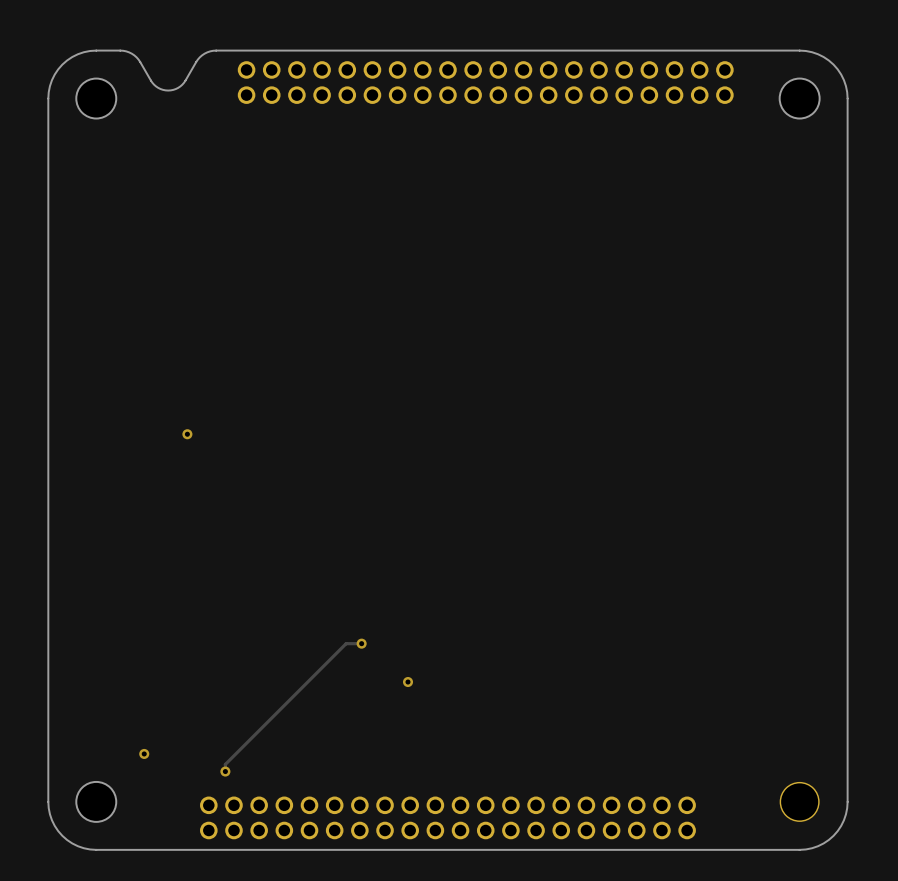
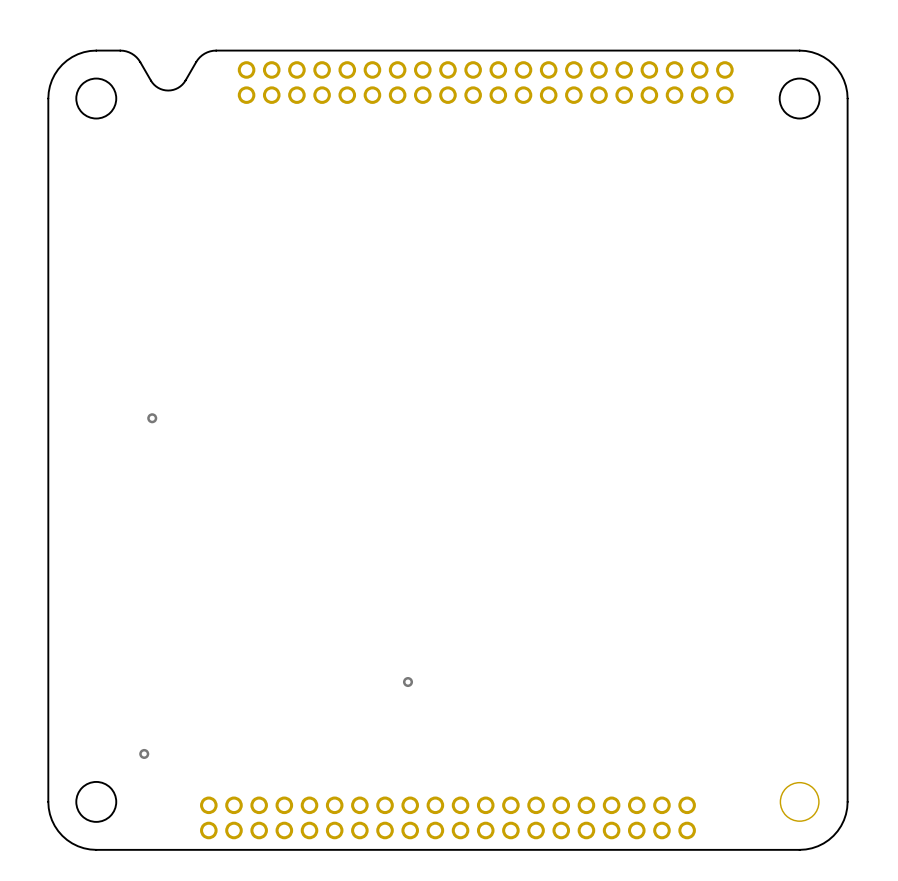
via position: (187, 434) -> (152, 418)
track: (361, 643) (346, 643) (225, 764) (225, 771) -> none
via: (361, 643) -> none
via: (225, 771) -> none

